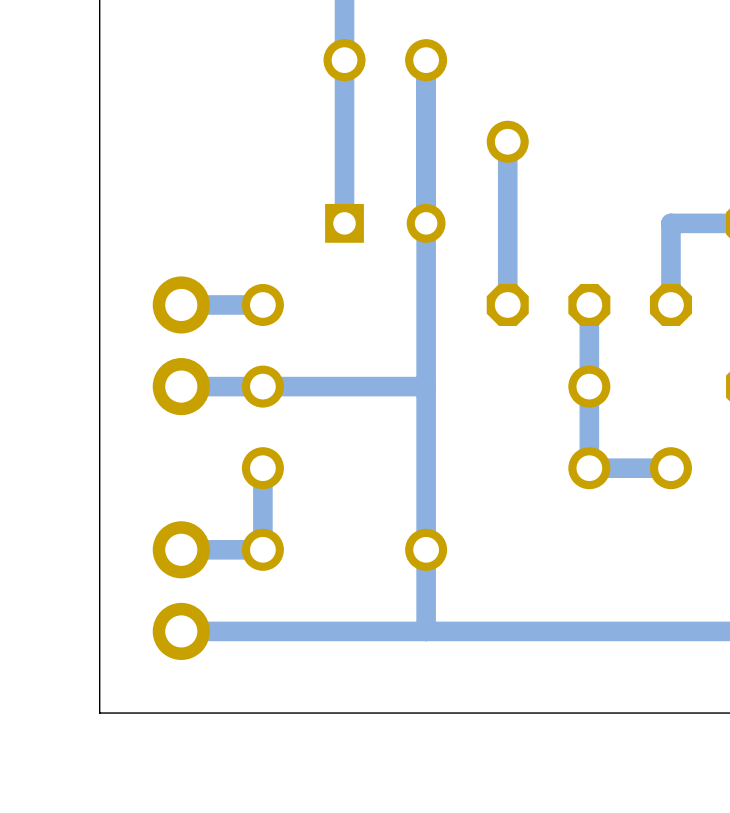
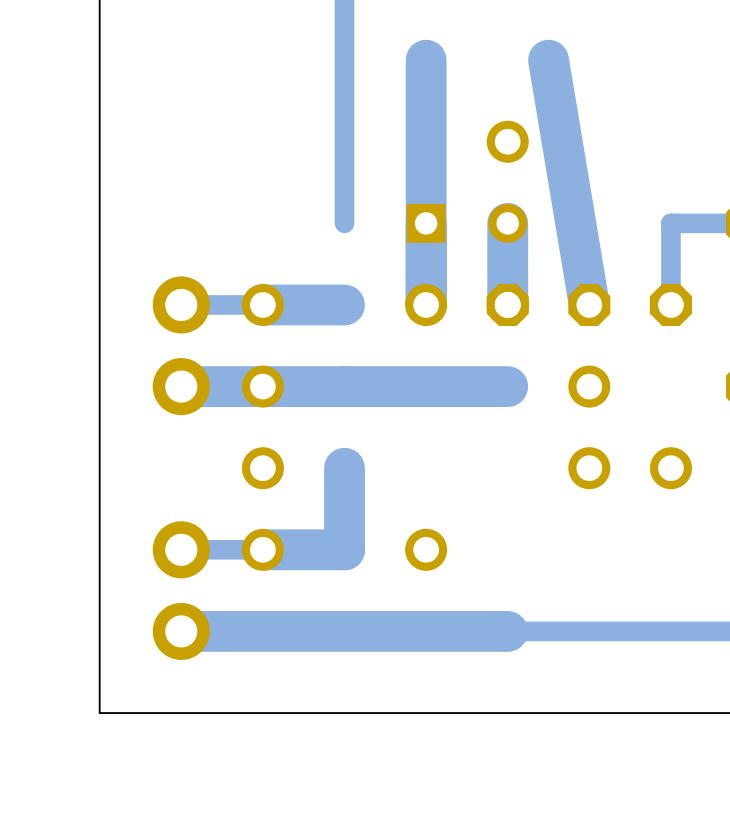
part position: (385, 60) -> (466, 304)
bottom track width: thin (426, 60) (426, 304) -> thick (426, 60) (426, 304)
bottom track: (507, 141) (507, 223) -> none
part position: (385, 223) -> (466, 223)
bottom track width: thin (507, 223) (507, 304) -> thick (507, 223) (507, 304)
bottom track: none -> (344, 304) (262, 304)
bottom track: (426, 304) (426, 631) -> none
bottom track: (589, 304) (589, 468) (670, 468) -> (589, 304) (548, 60)
bottom track width: thin (426, 386) (181, 386) -> thick (426, 386) (181, 386)
bottom track: none -> (507, 386) (426, 386)
bottom track: (262, 468) (262, 549) -> (344, 468) (344, 549) (262, 549)
bottom track width: thin (507, 631) (181, 631) -> thick (507, 631) (181, 631)

